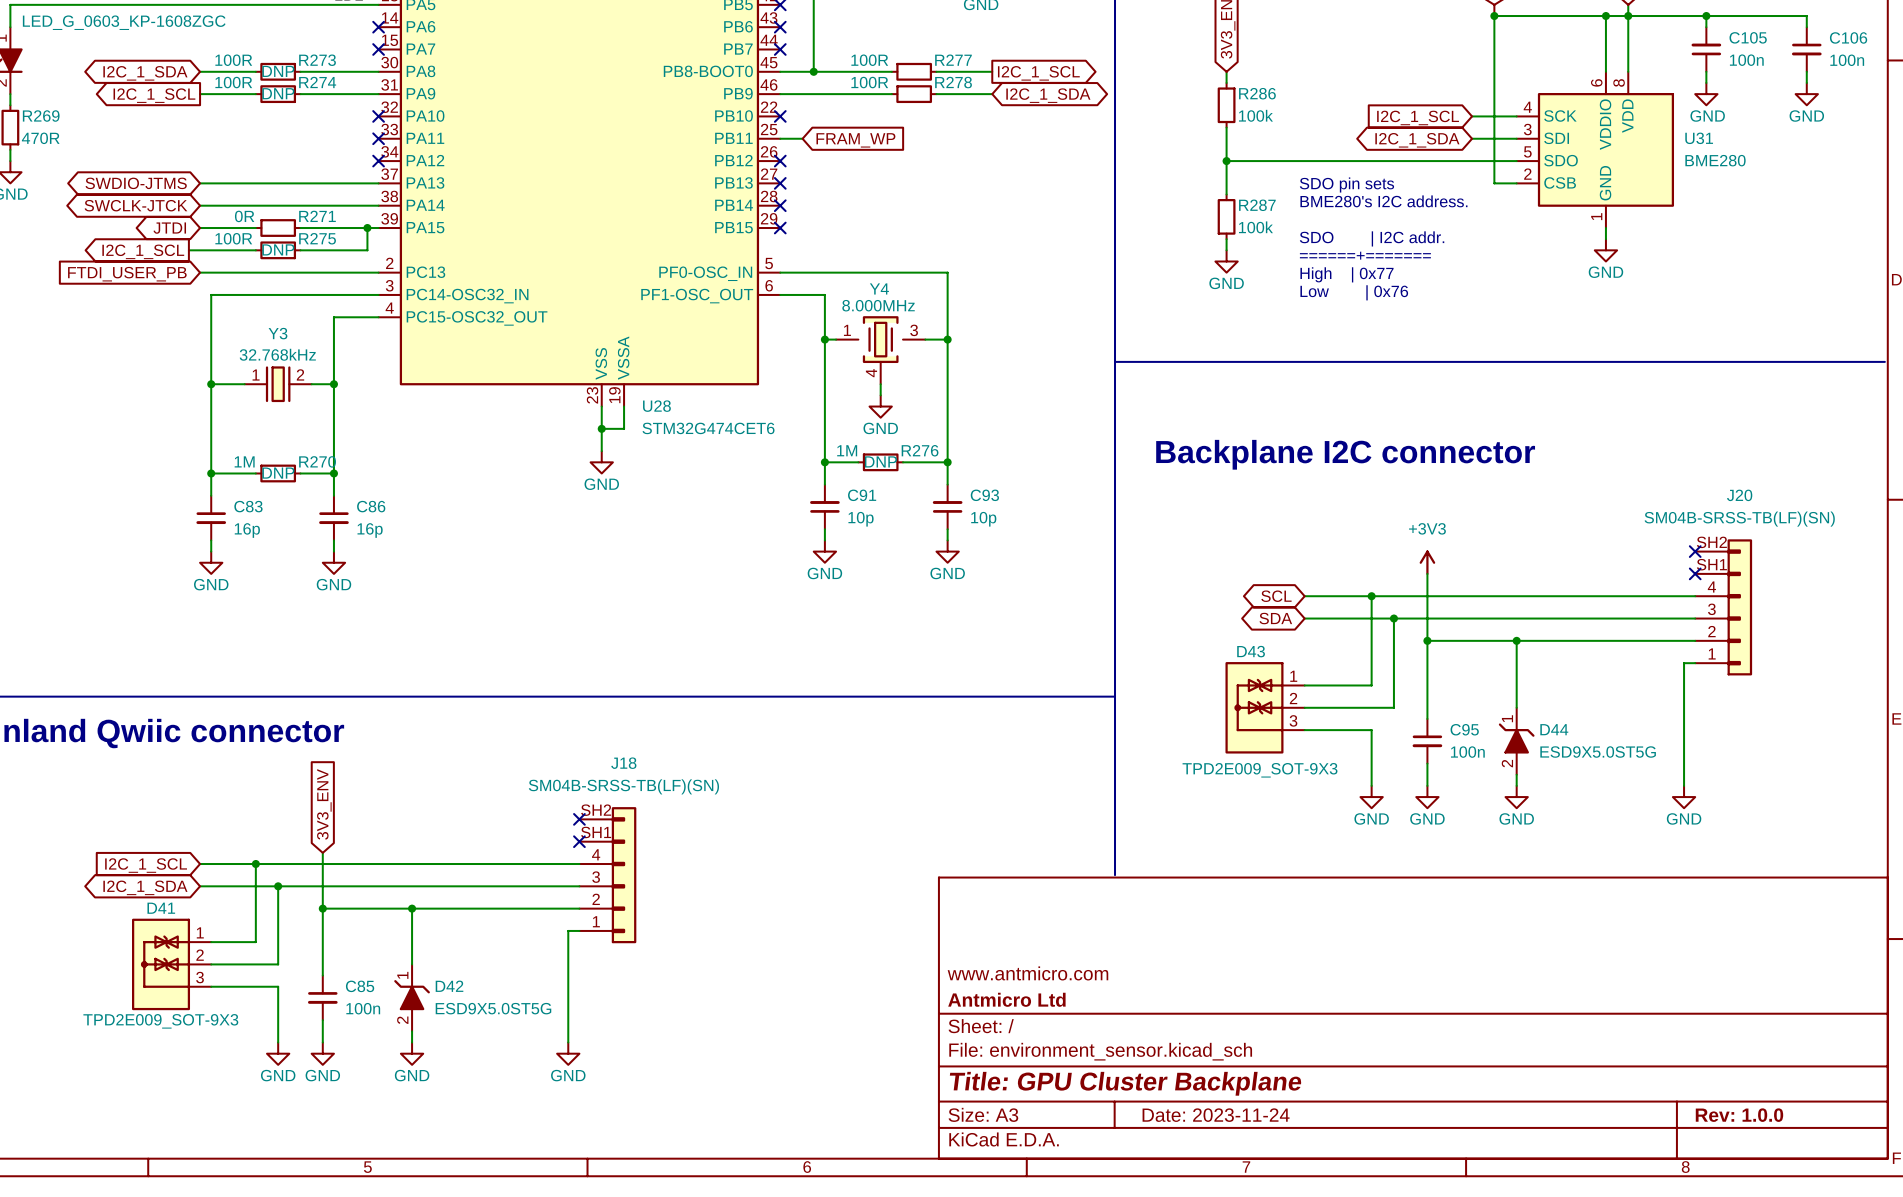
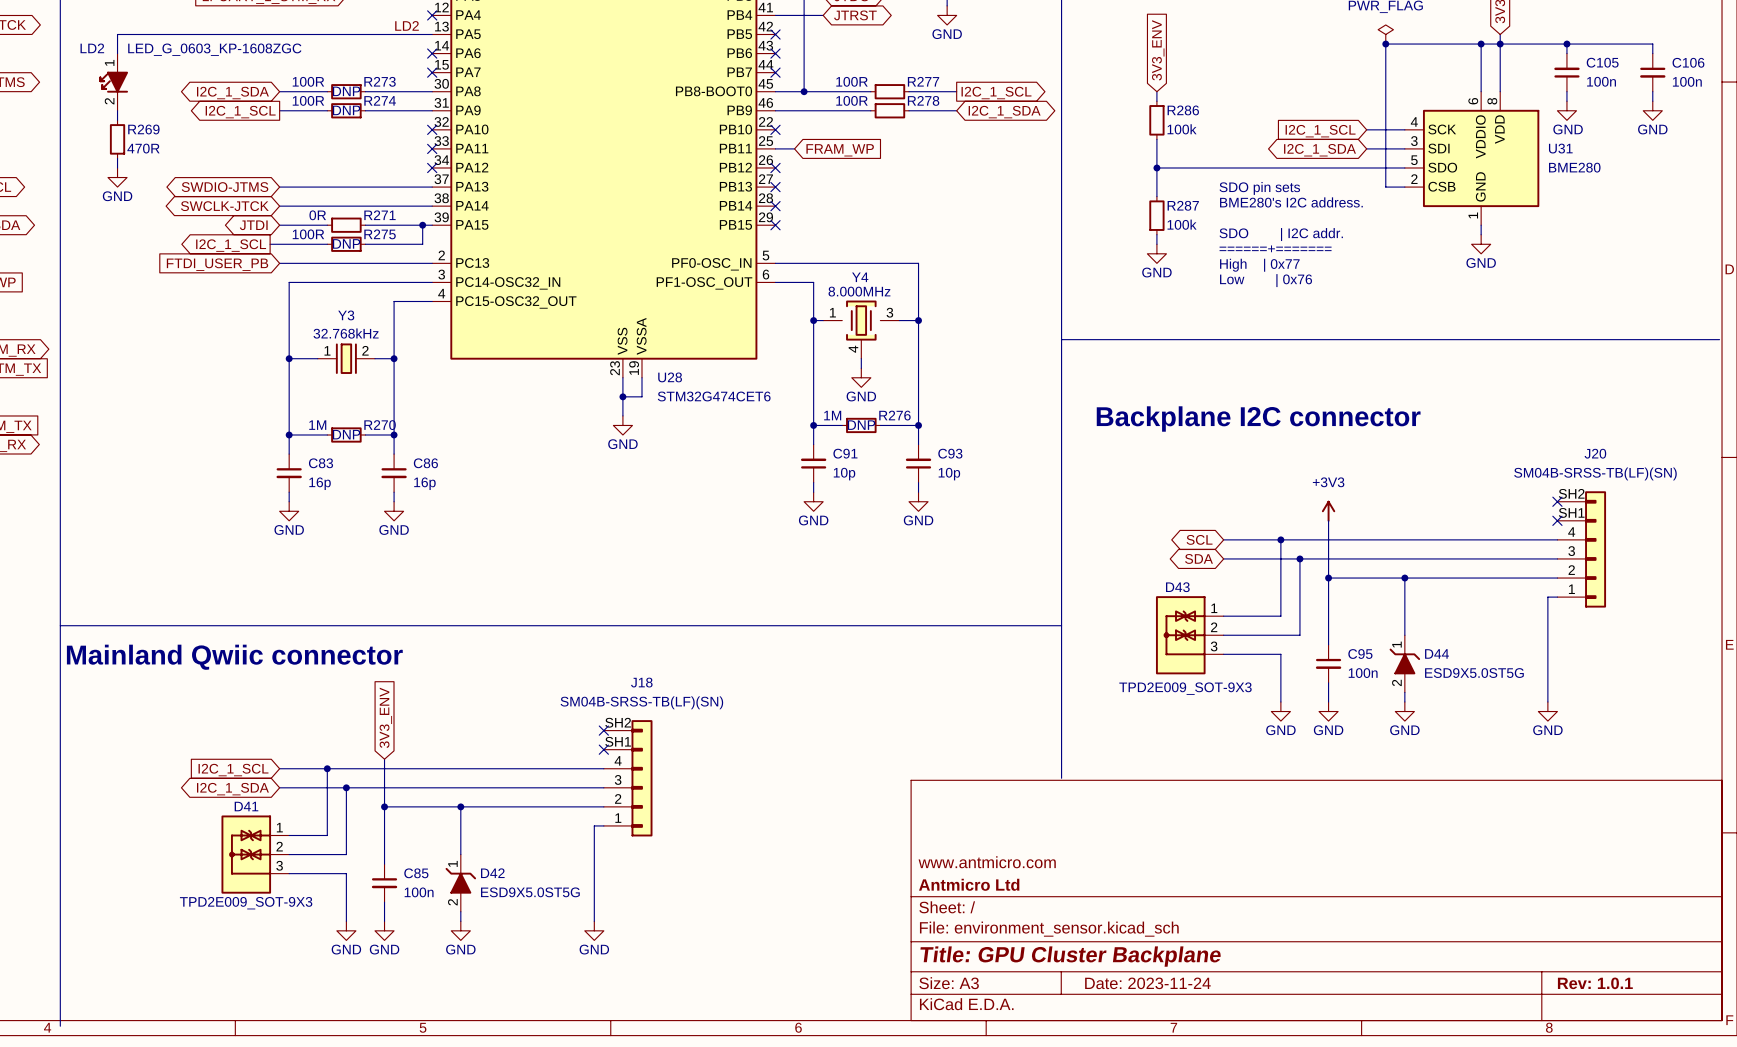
title block: Rev: 1.0.0 (1739, 1115) -> Rev: 1.0.1 (1595, 983)

